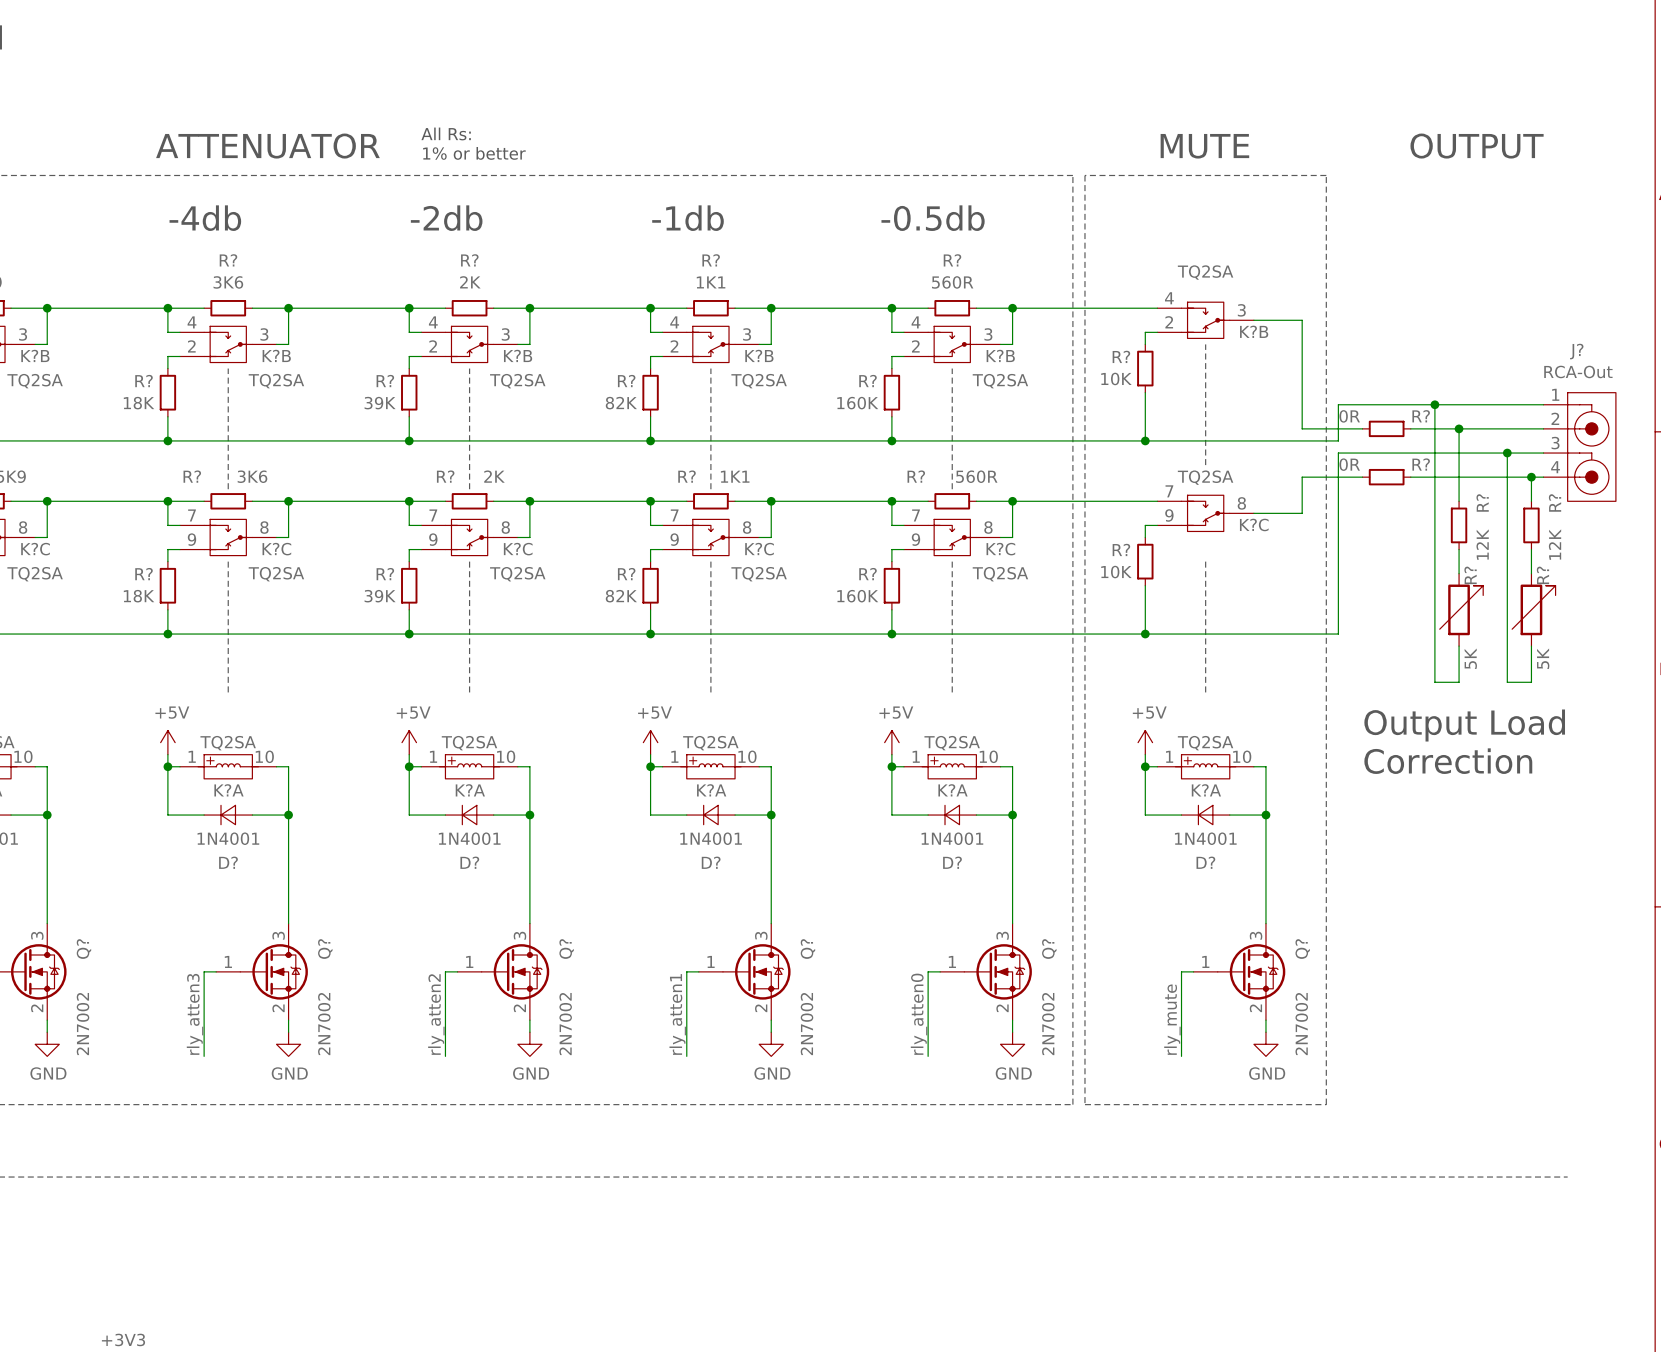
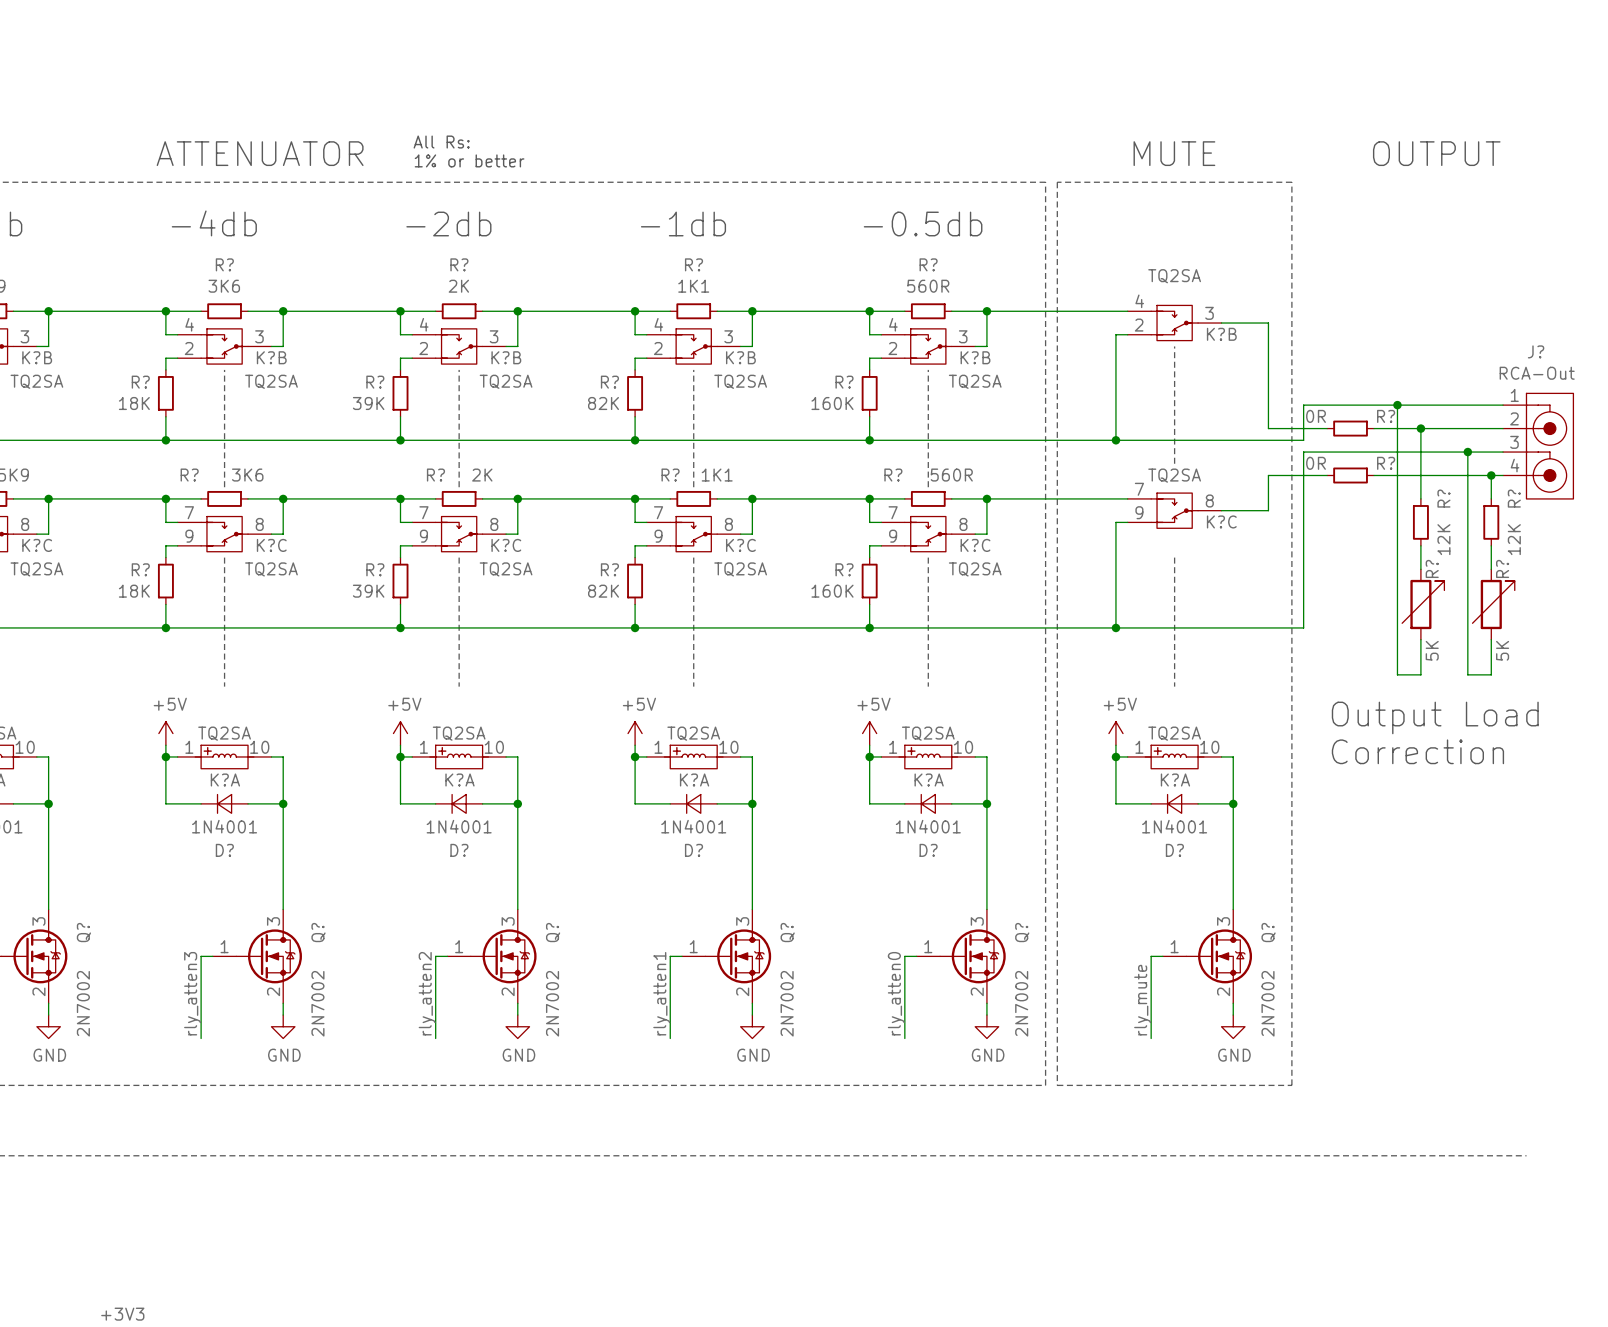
wire: none -> (1115, 346) (1115, 393)
R?: 10K (1145, 368) -> none
wire: none -> (1115, 534) (1115, 581)
R?: 10K (1145, 561) -> none

